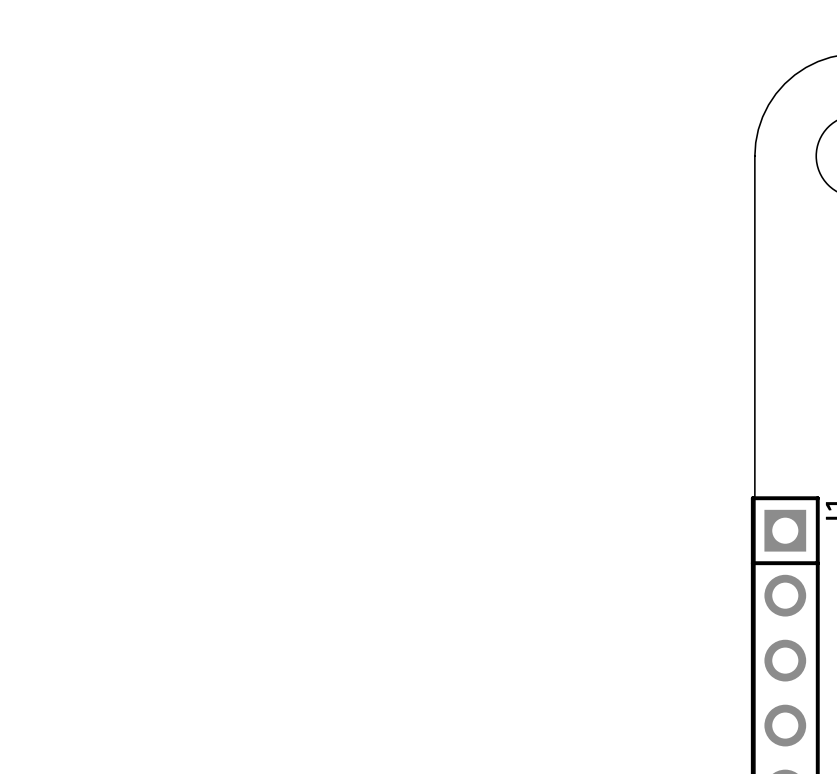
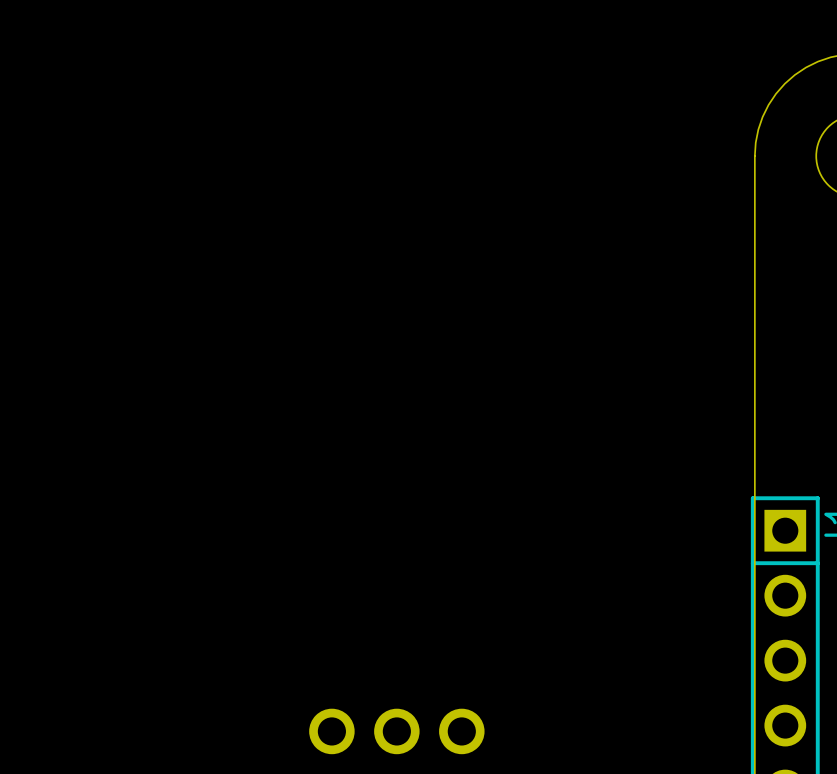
part: none -> (396, 731)

